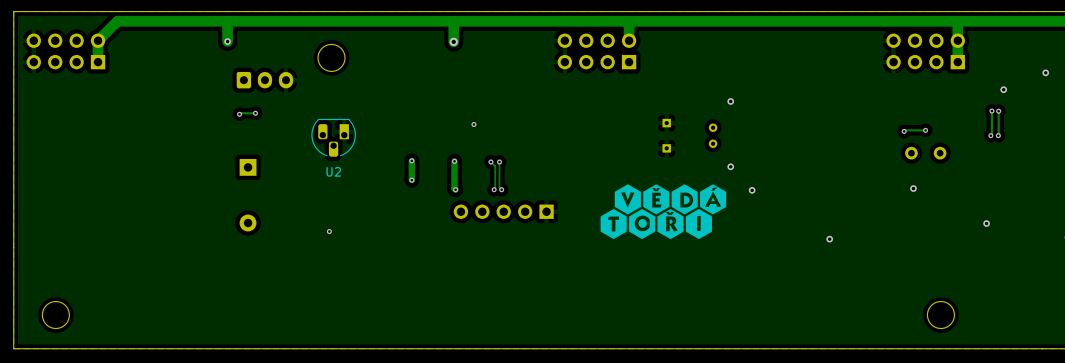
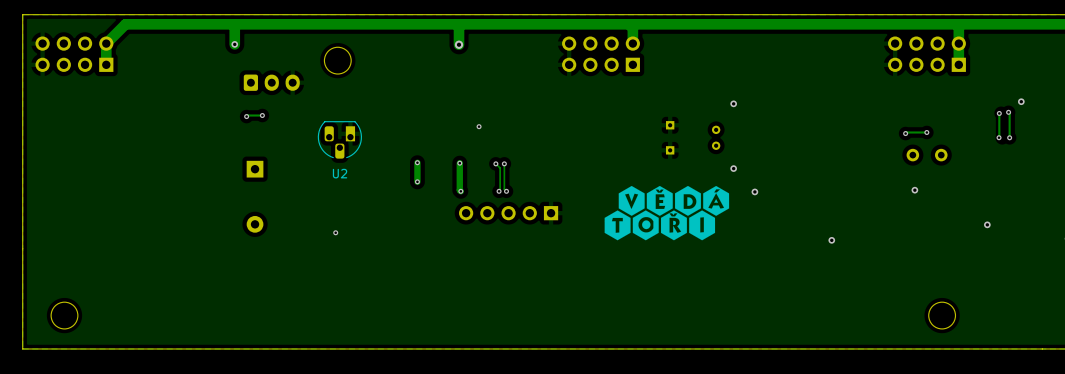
via: (1045, 72) -> none
via: (1003, 89) -> none
via: none -> (1021, 101)
track: none -> (1008, 112) (1009, 137)
via: none -> (1008, 112)
track: (991, 111) (990, 135) -> none
via: (991, 111) -> none
via: (990, 135) -> none
via: none -> (1009, 137)

